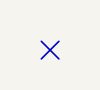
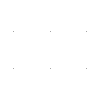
no-connect mark: (50, 50) -> none

